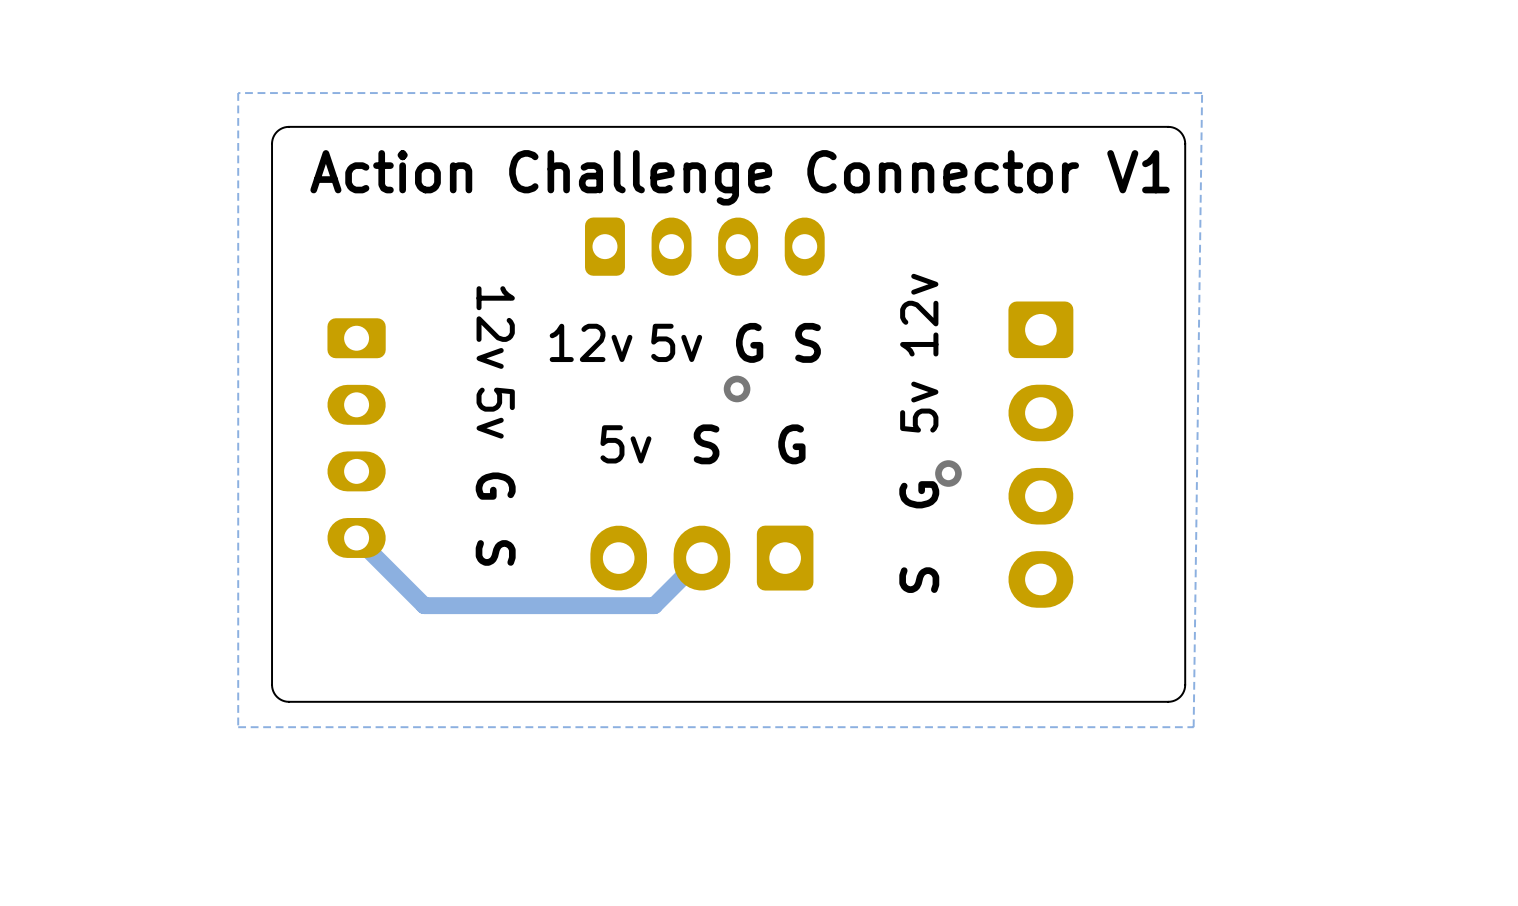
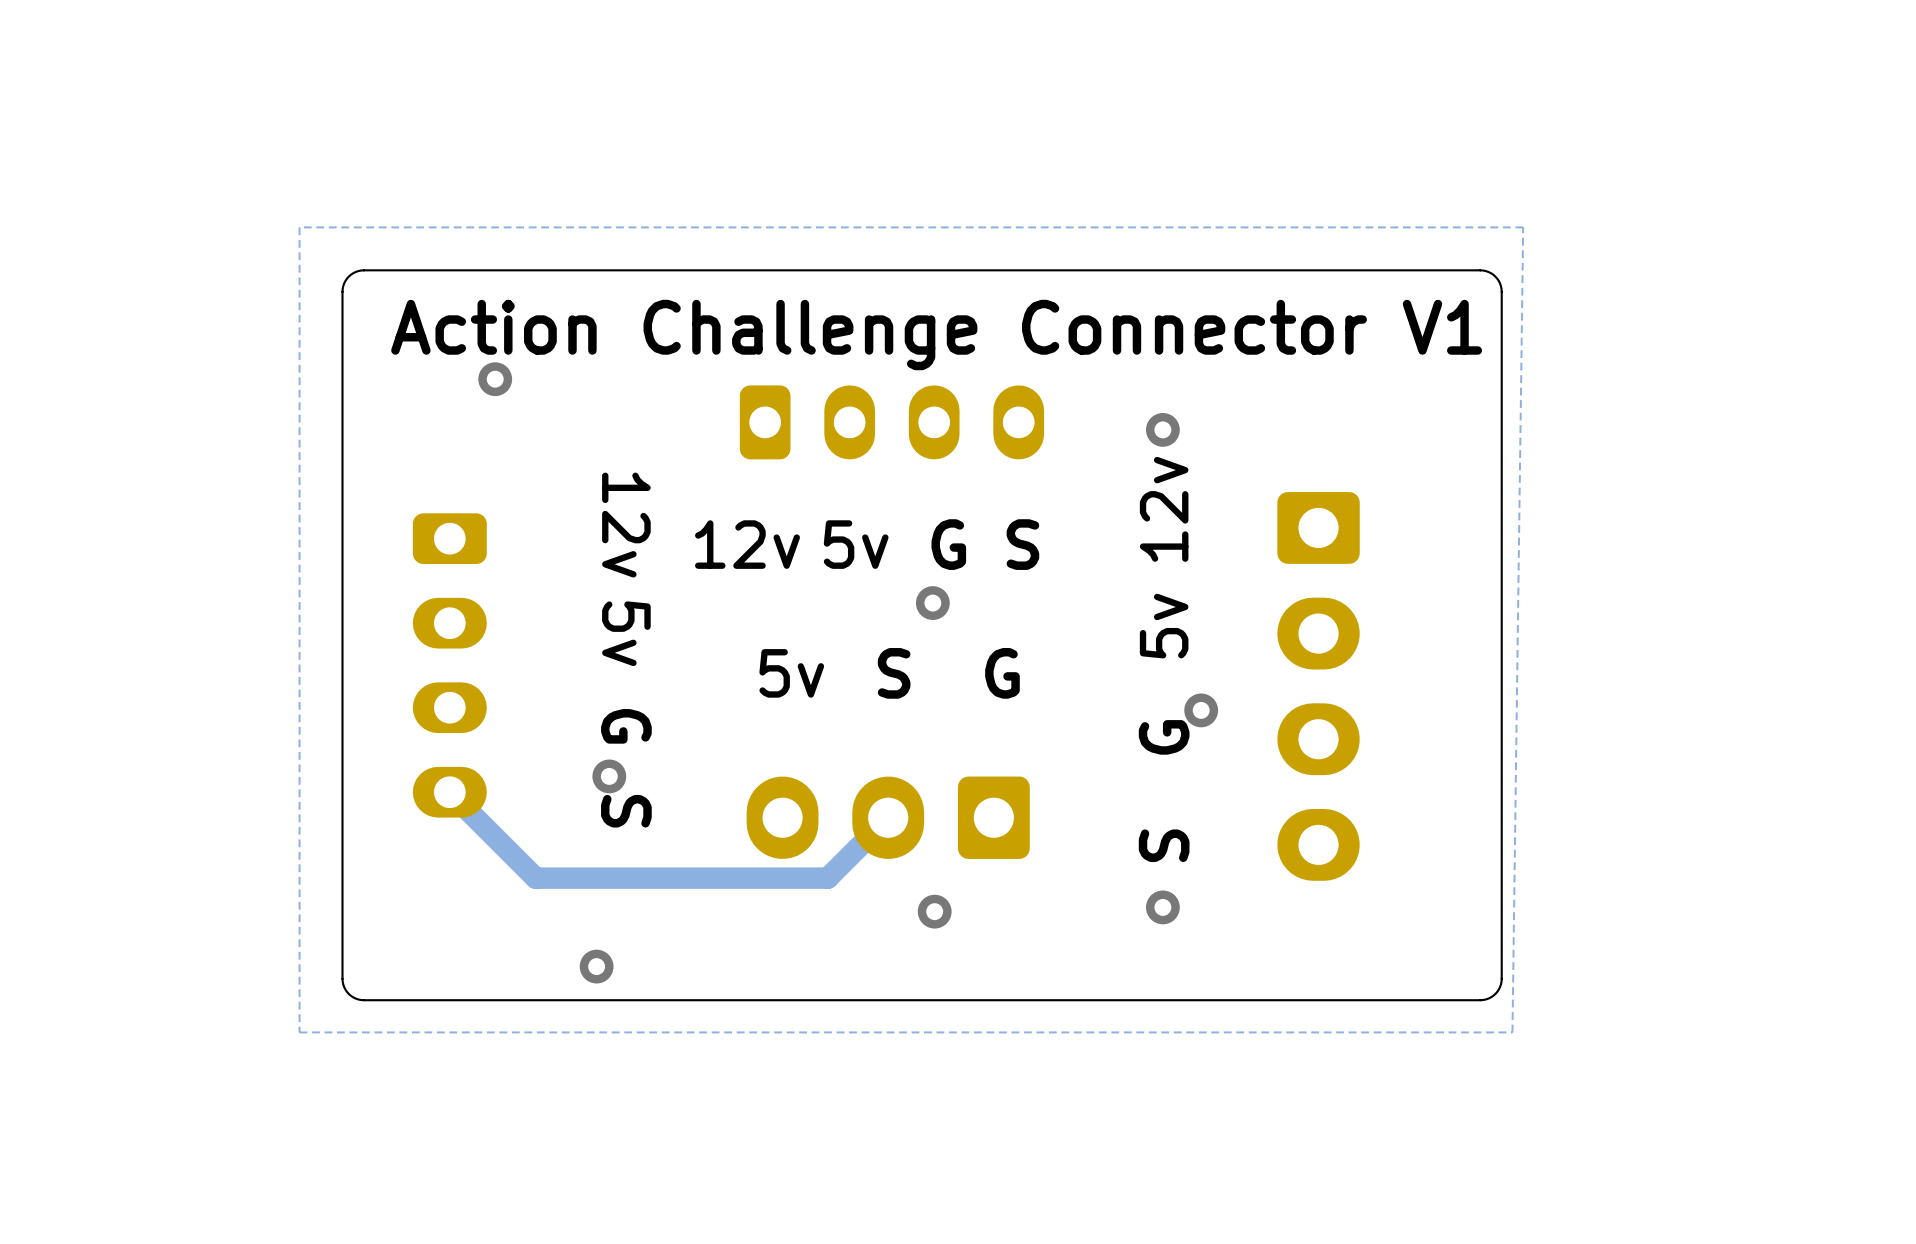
via: none -> (495, 379)
via: none -> (1162, 429)
via: none -> (609, 776)
via: none -> (1162, 907)
via: none -> (934, 911)
via: none -> (596, 966)

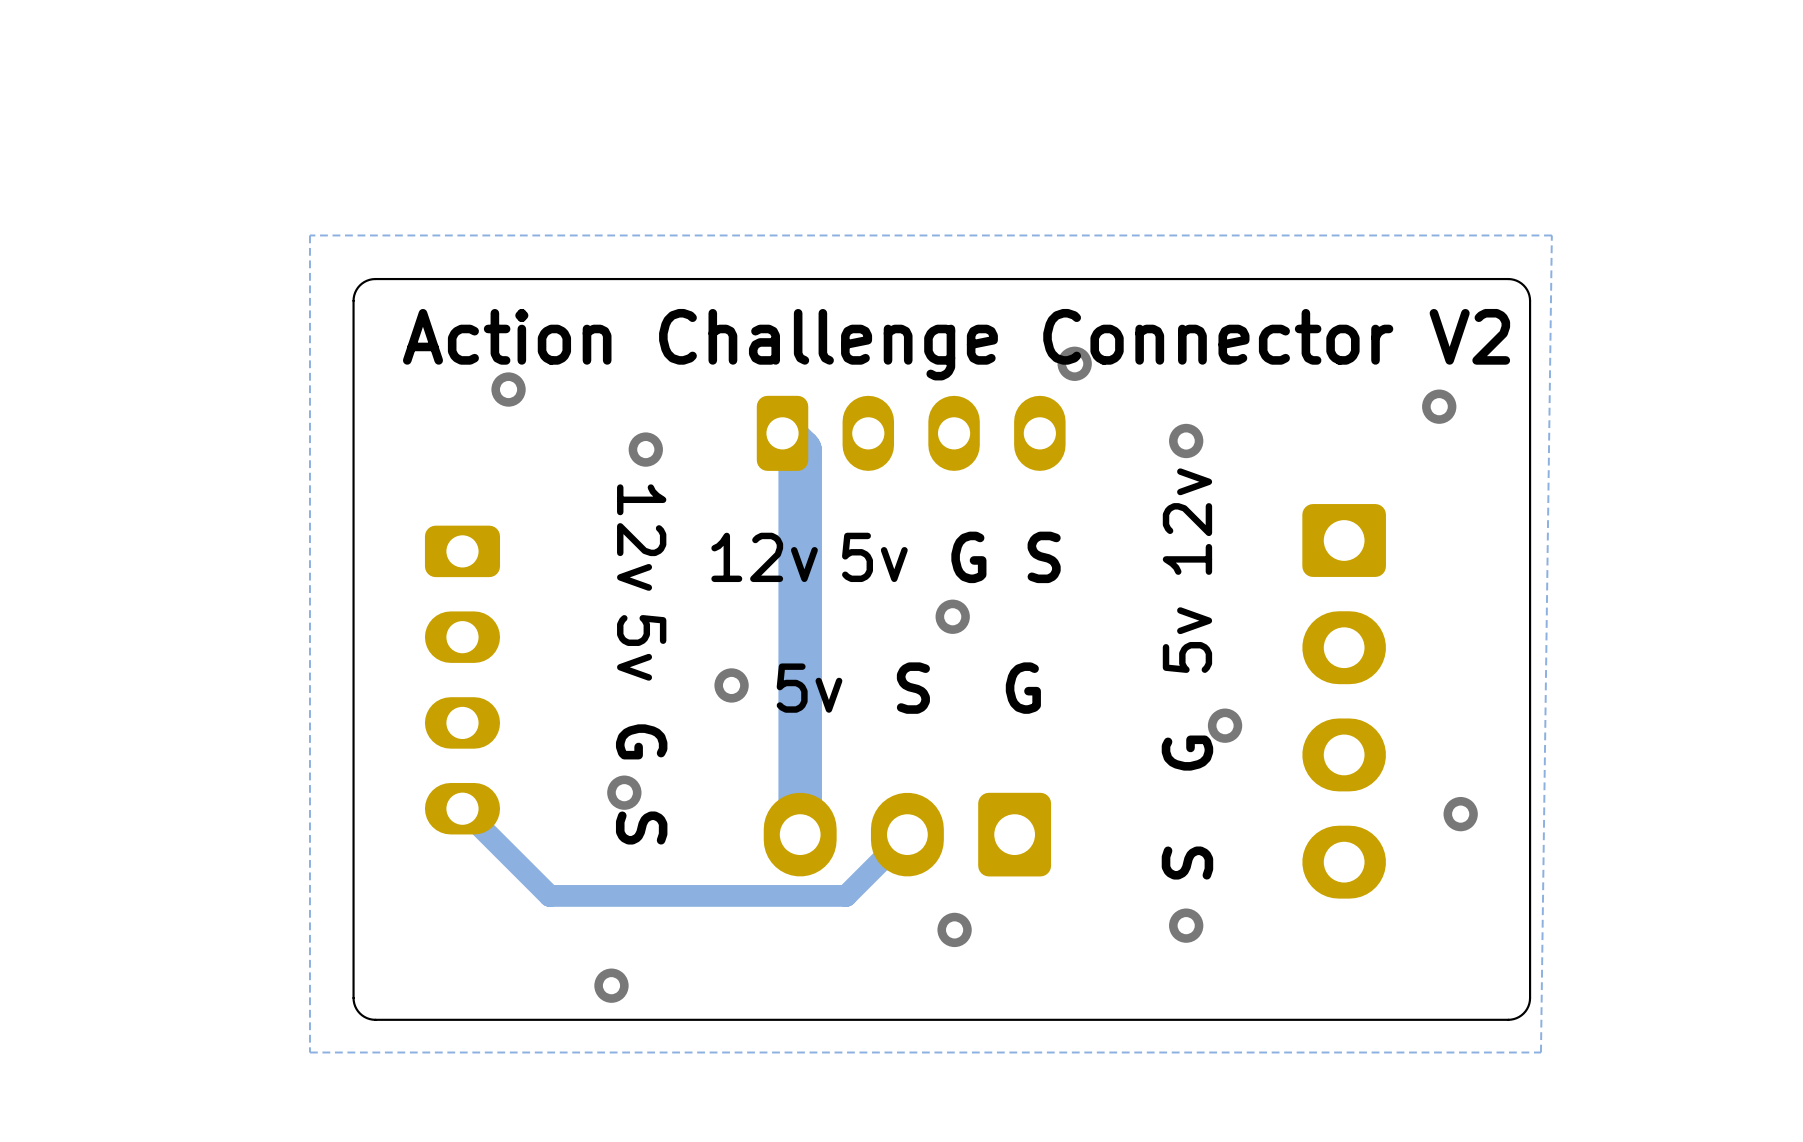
text: Action Challenge Connector V1 (936, 335) -> Action Challenge Connector V2 (956, 344)
via: none -> (1074, 363)
via: none -> (1439, 406)
track: none -> (782, 433) (800, 451) (800, 834)
via: none -> (645, 449)
via: none -> (731, 685)
via: none -> (1460, 814)

